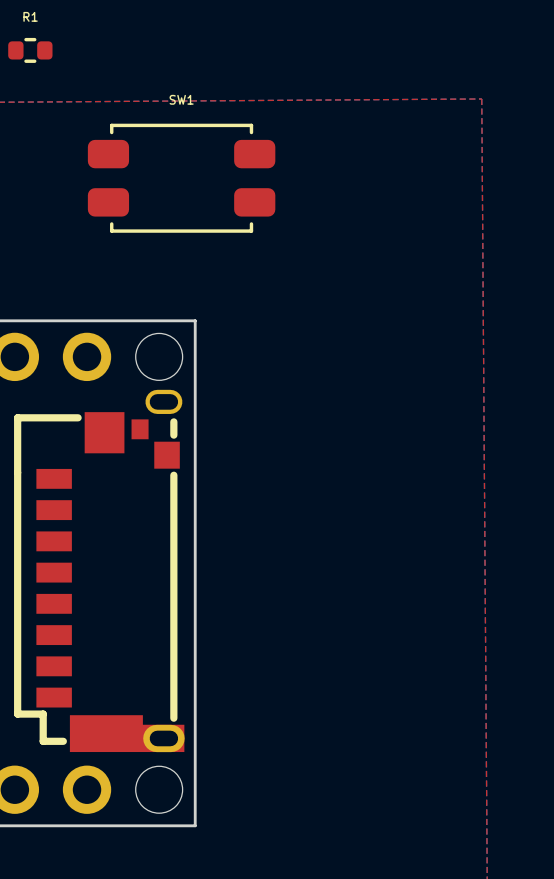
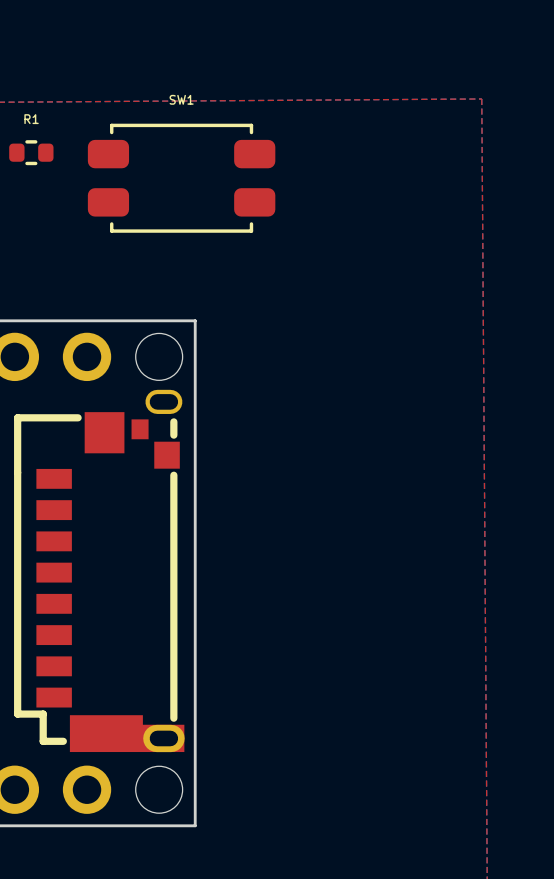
R1 position: (30, 50) -> (31, 152)

